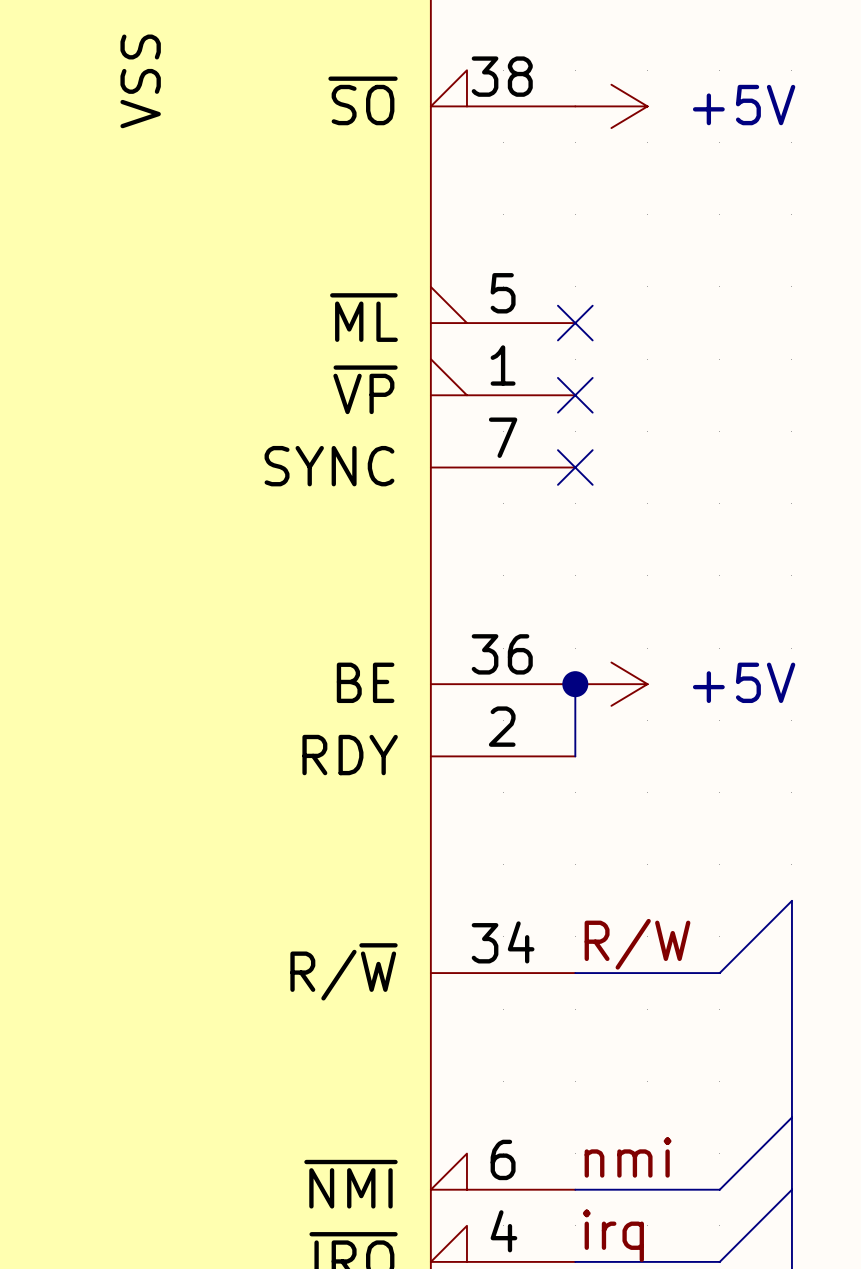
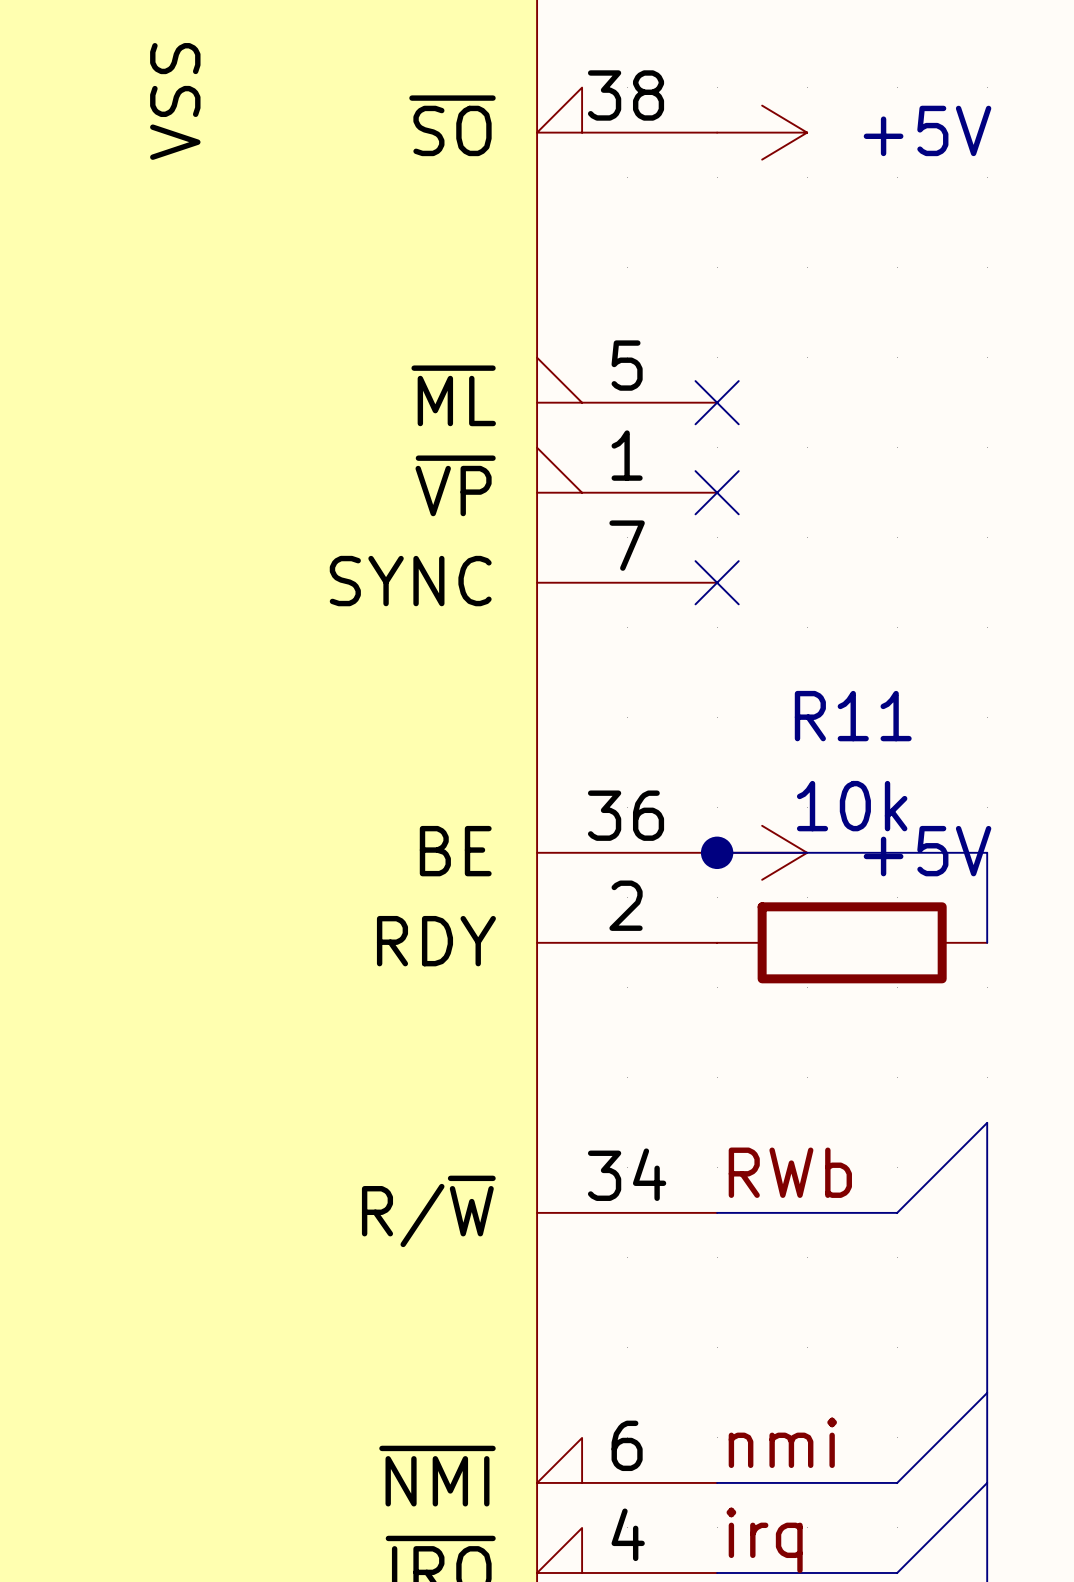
wire: (575, 684) (575, 756) -> (717, 852) (987, 852) (987, 942)
R11: none -> 10k (852, 942)
label: R/W (637, 944) -> RWb (790, 1172)

